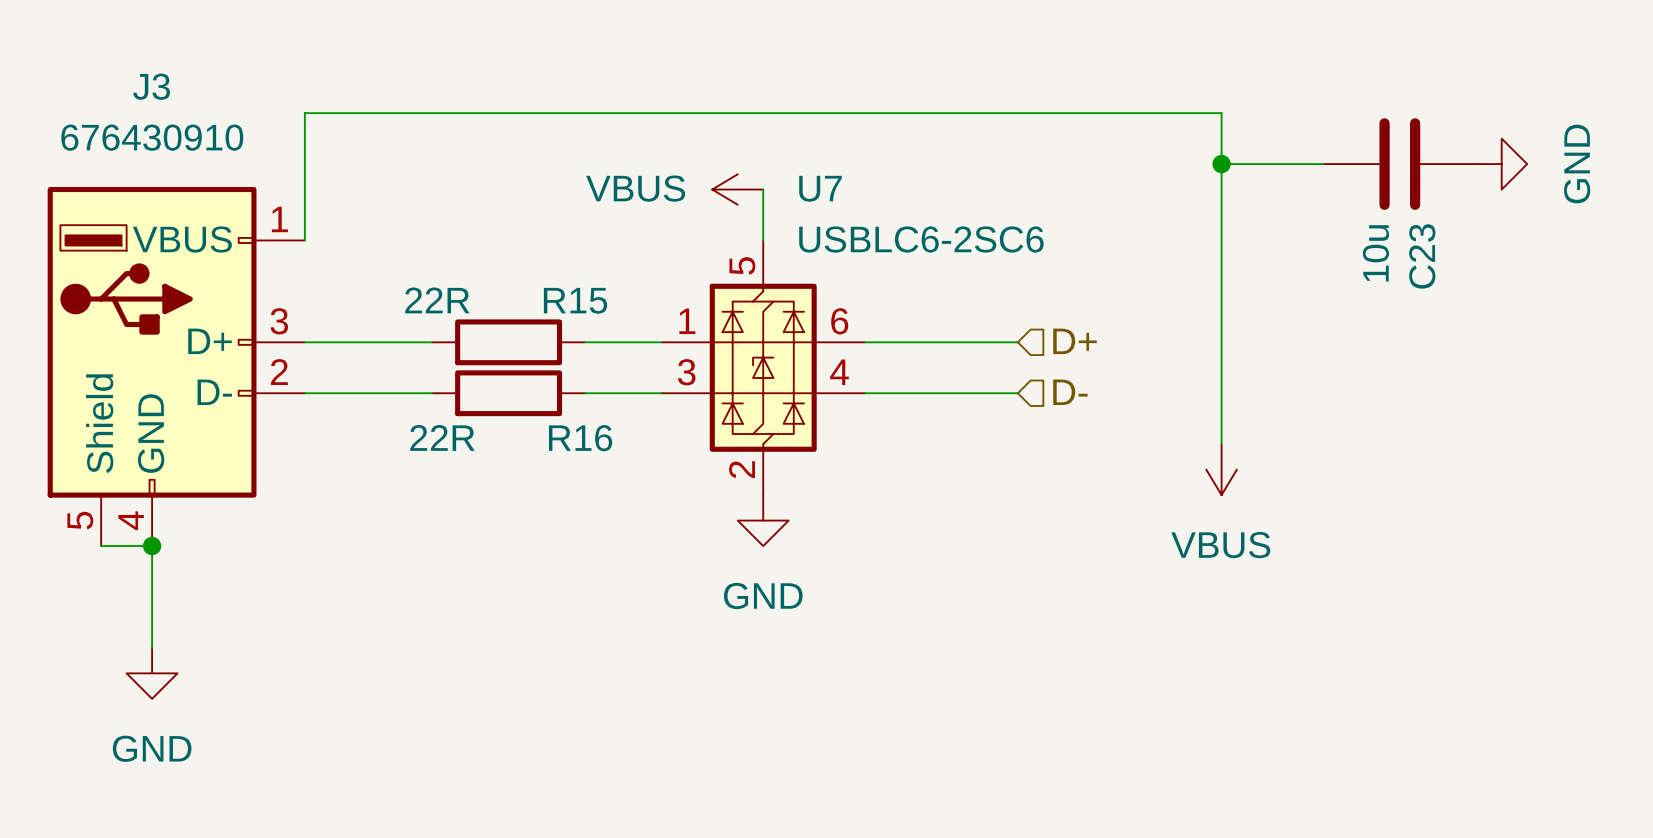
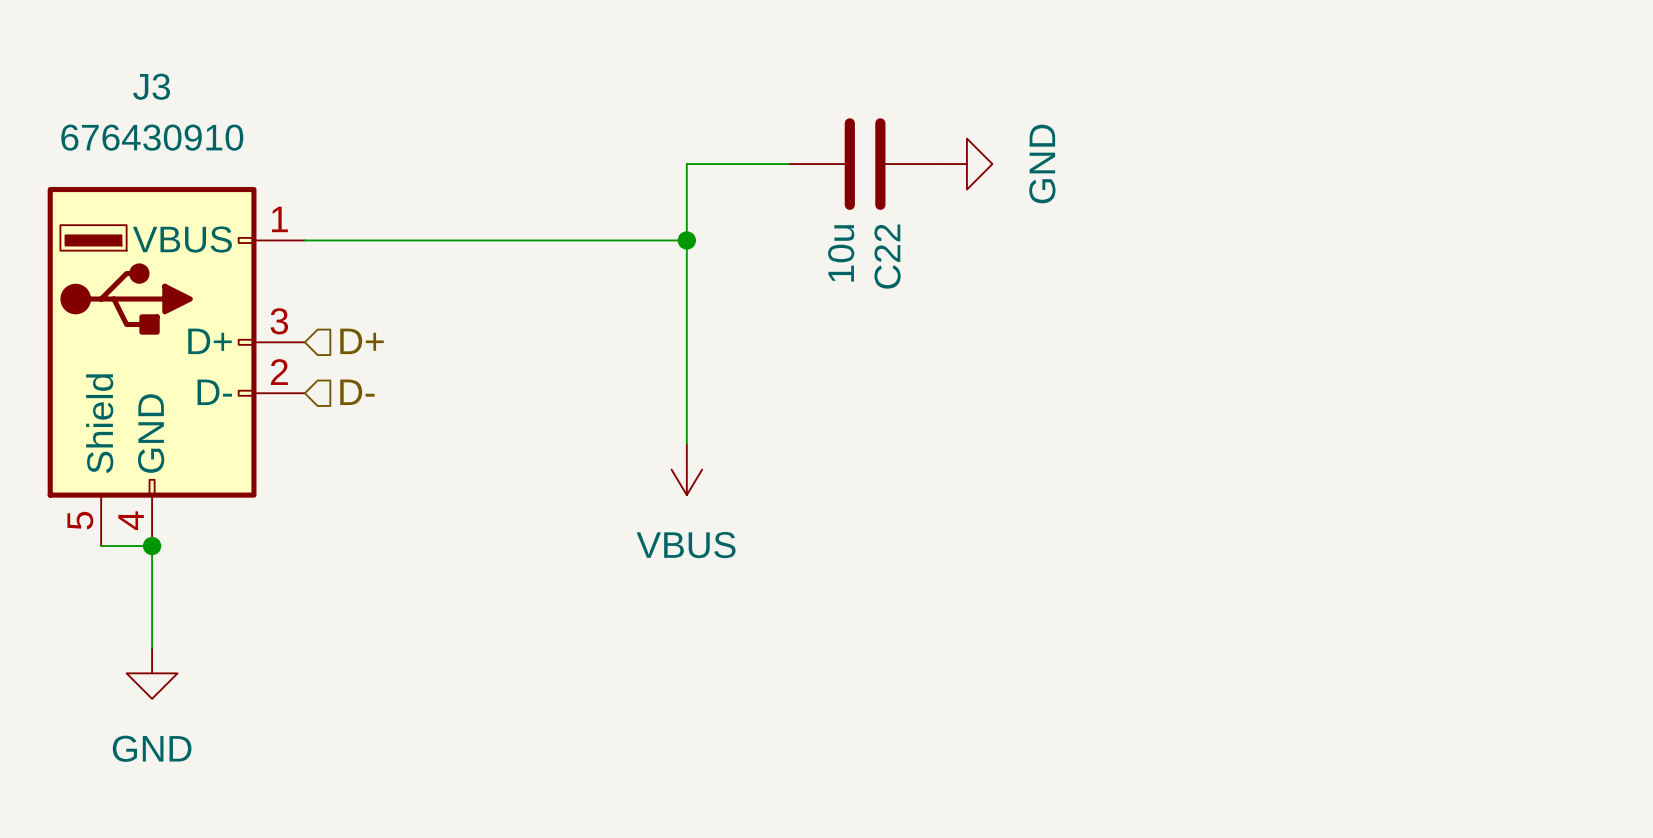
wire: none -> (788, 164) (686, 164) (686, 444)
C22: none -> 10u (865, 164)
power symbol: none -> GND (966, 164)
wire: (1221, 164) (1323, 164) -> none
junction: (1221, 164) -> none
C23: 10u (1399, 164) -> none
power symbol: GND (1501, 164) -> none
power symbol: VBUS (737, 189) -> none
wire: (763, 189) (763, 240) -> none
wire: (304, 240) (304, 113) (1221, 113) (1221, 444) -> (304, 240) (686, 240)
junction: none -> (686, 240)
hierarchical label: none -> D+ (361, 341)
hierarchical label: D+ (1074, 341) -> none
wire: (304, 342) (432, 342) -> none
R15: 22R (508, 342) -> none
wire: (584, 342) (661, 342) -> none
wire: (865, 342) (1017, 342) -> none
U7: USBLC6-2SC6 (763, 367) -> none
hierarchical label: none -> D- (357, 392)
hierarchical label: D- (1070, 392) -> none
wire: (304, 393) (432, 393) -> none
R16: 22R (508, 393) -> none
wire: (584, 393) (661, 393) -> none
wire: (865, 393) (1017, 393) -> none
power symbol: none -> VBUS (686, 469)
power symbol: VBUS (1221, 469) -> none
power symbol: GND (763, 520) -> none

